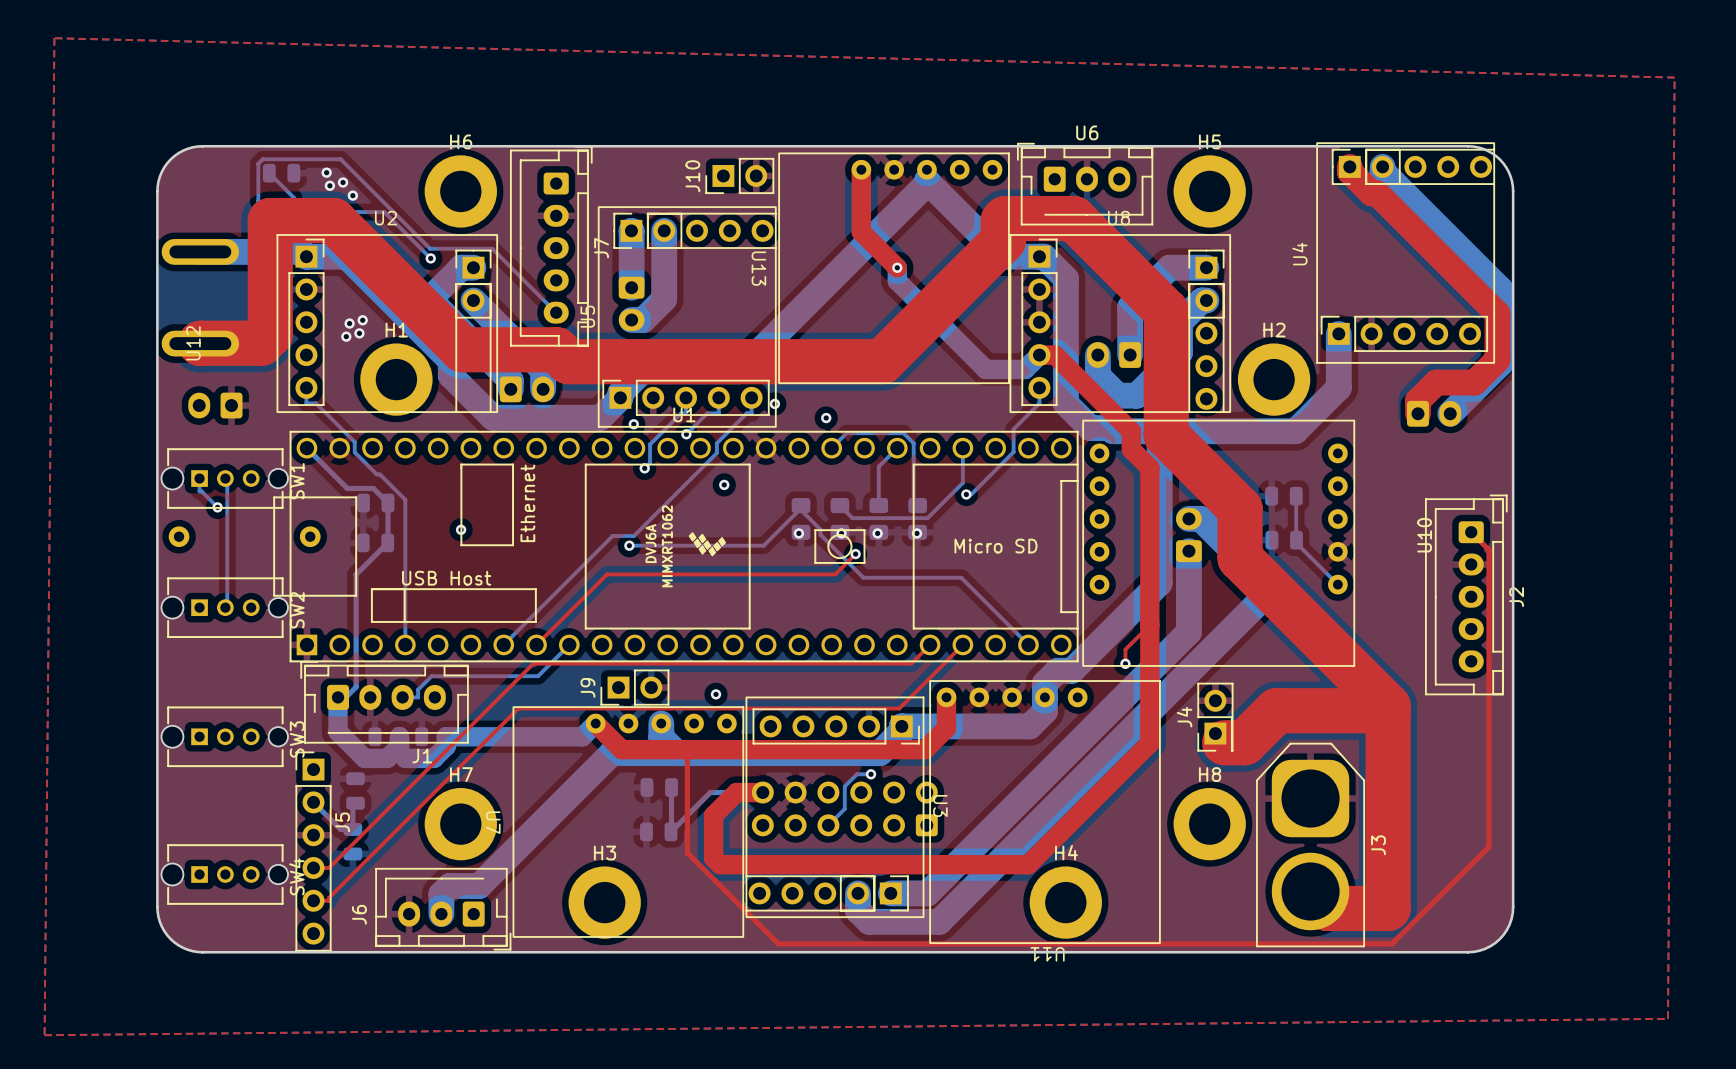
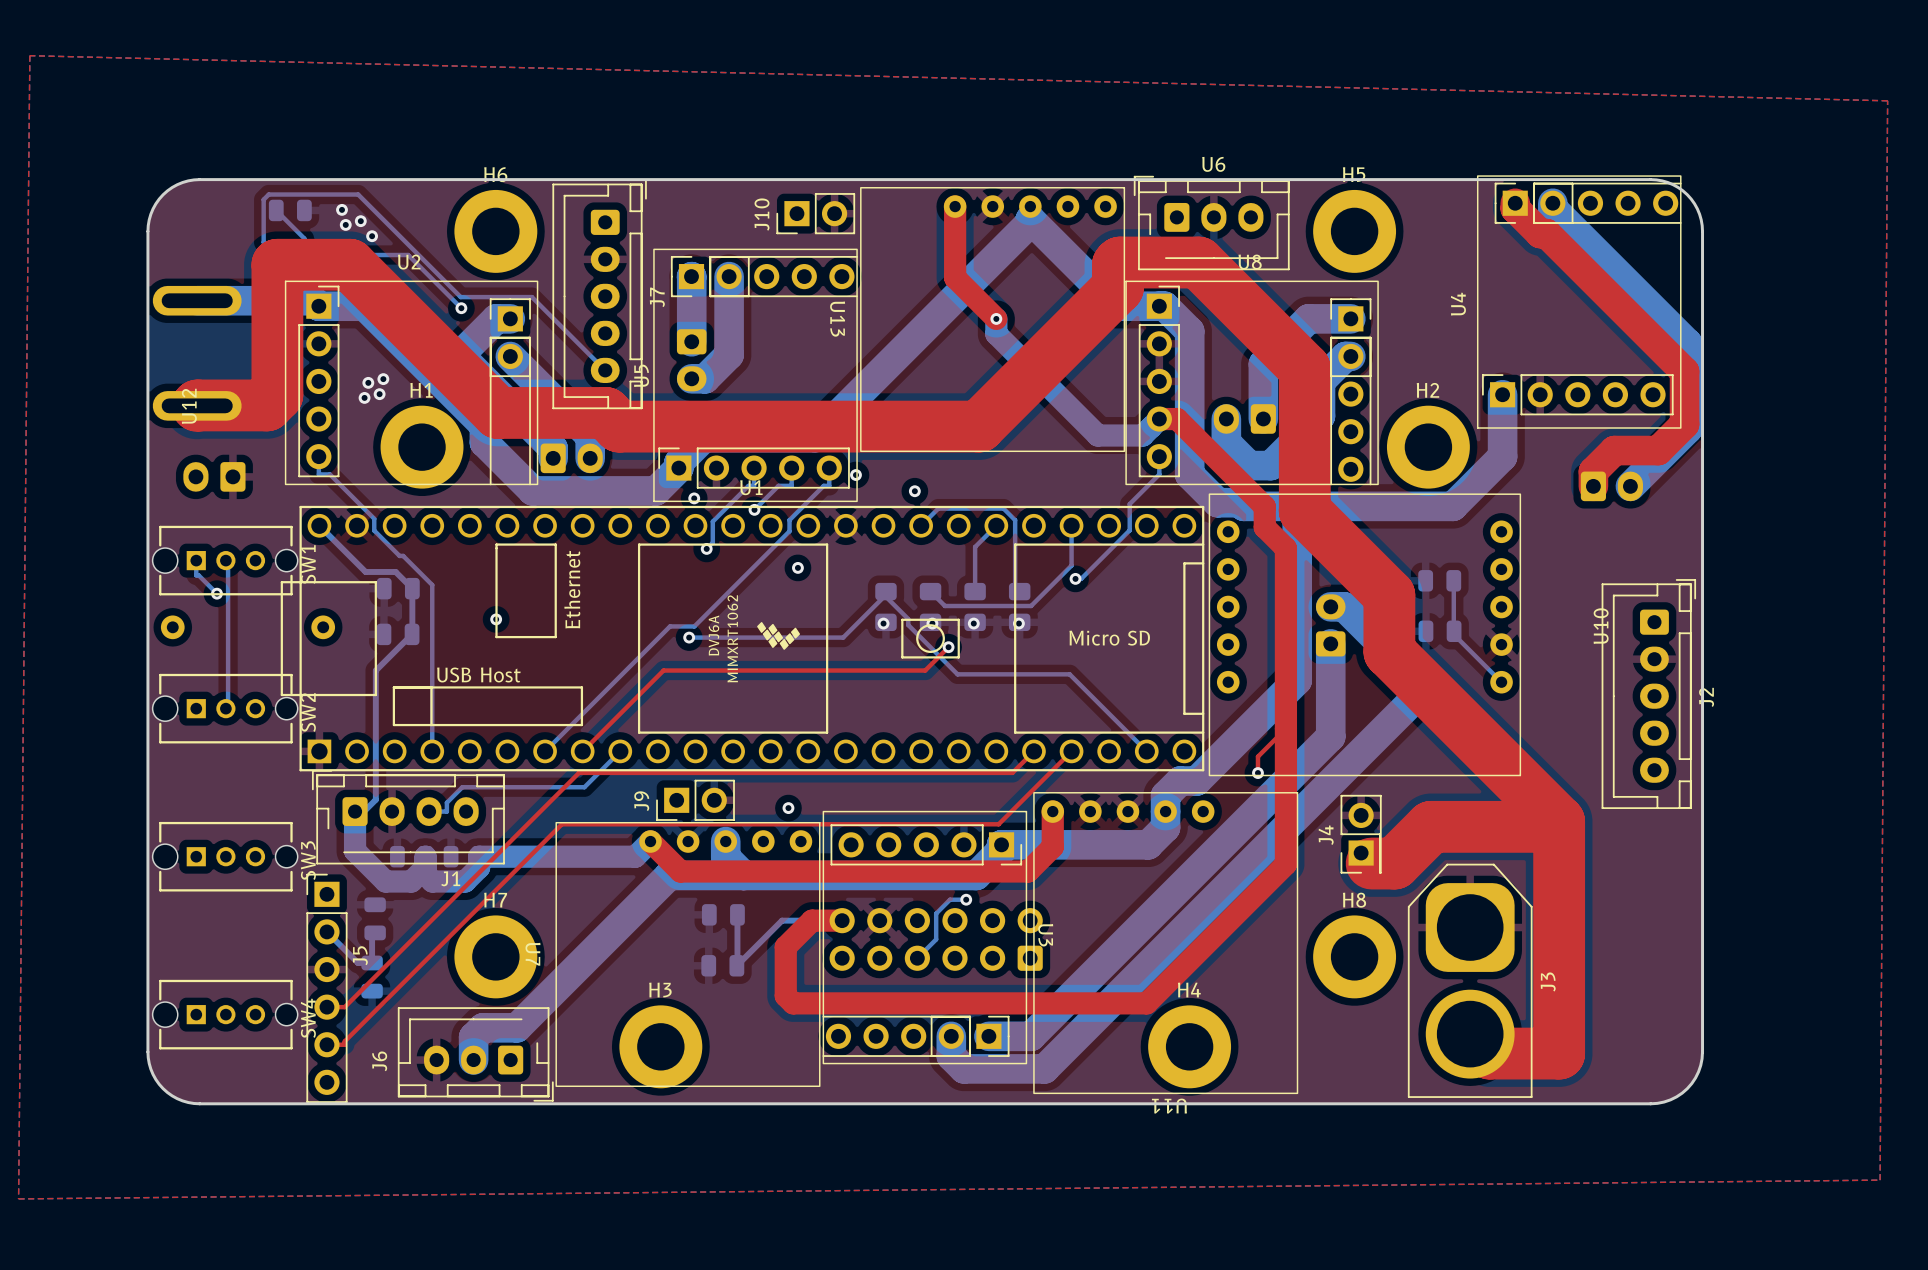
top track: (1471, 532) (1488, 549) (1488, 846) (1391, 943) (778, 943) (687, 852) (687, 749) -> none

